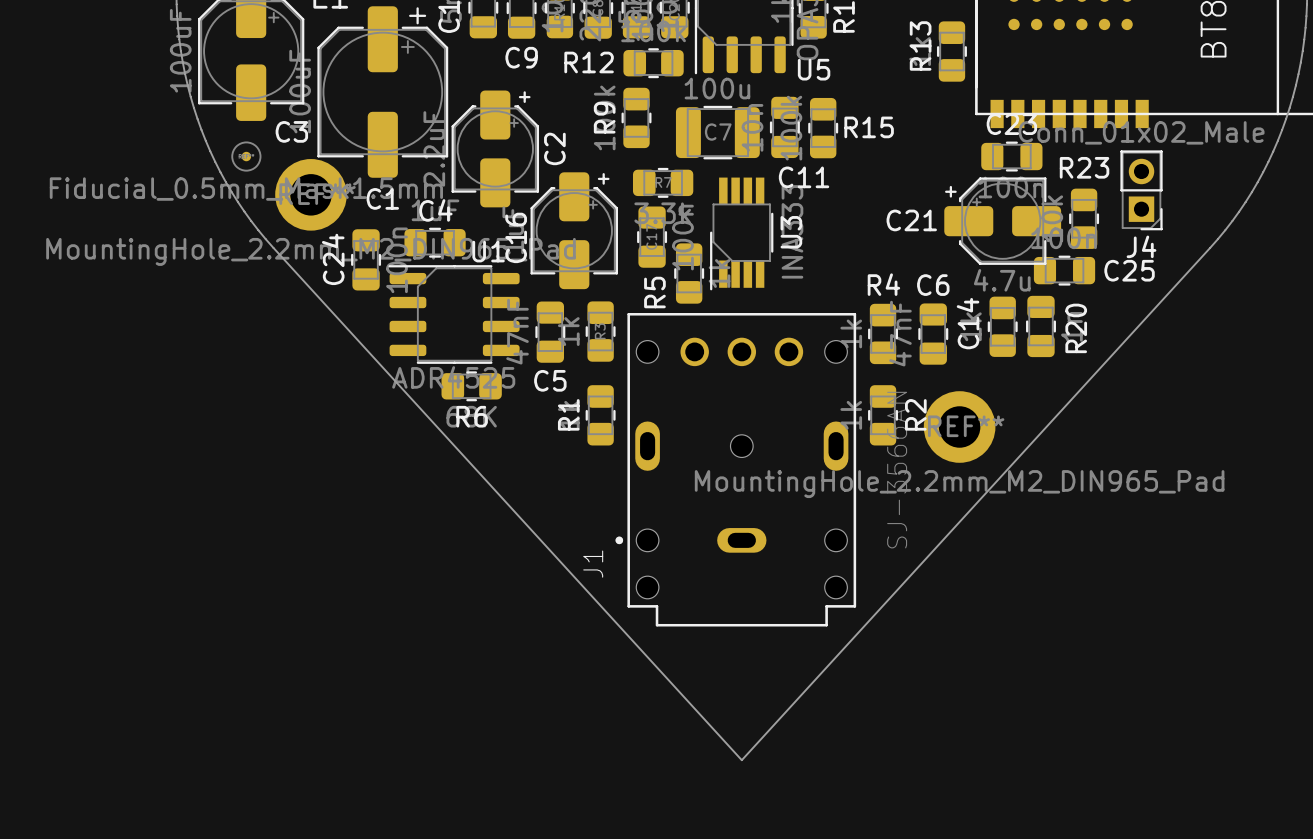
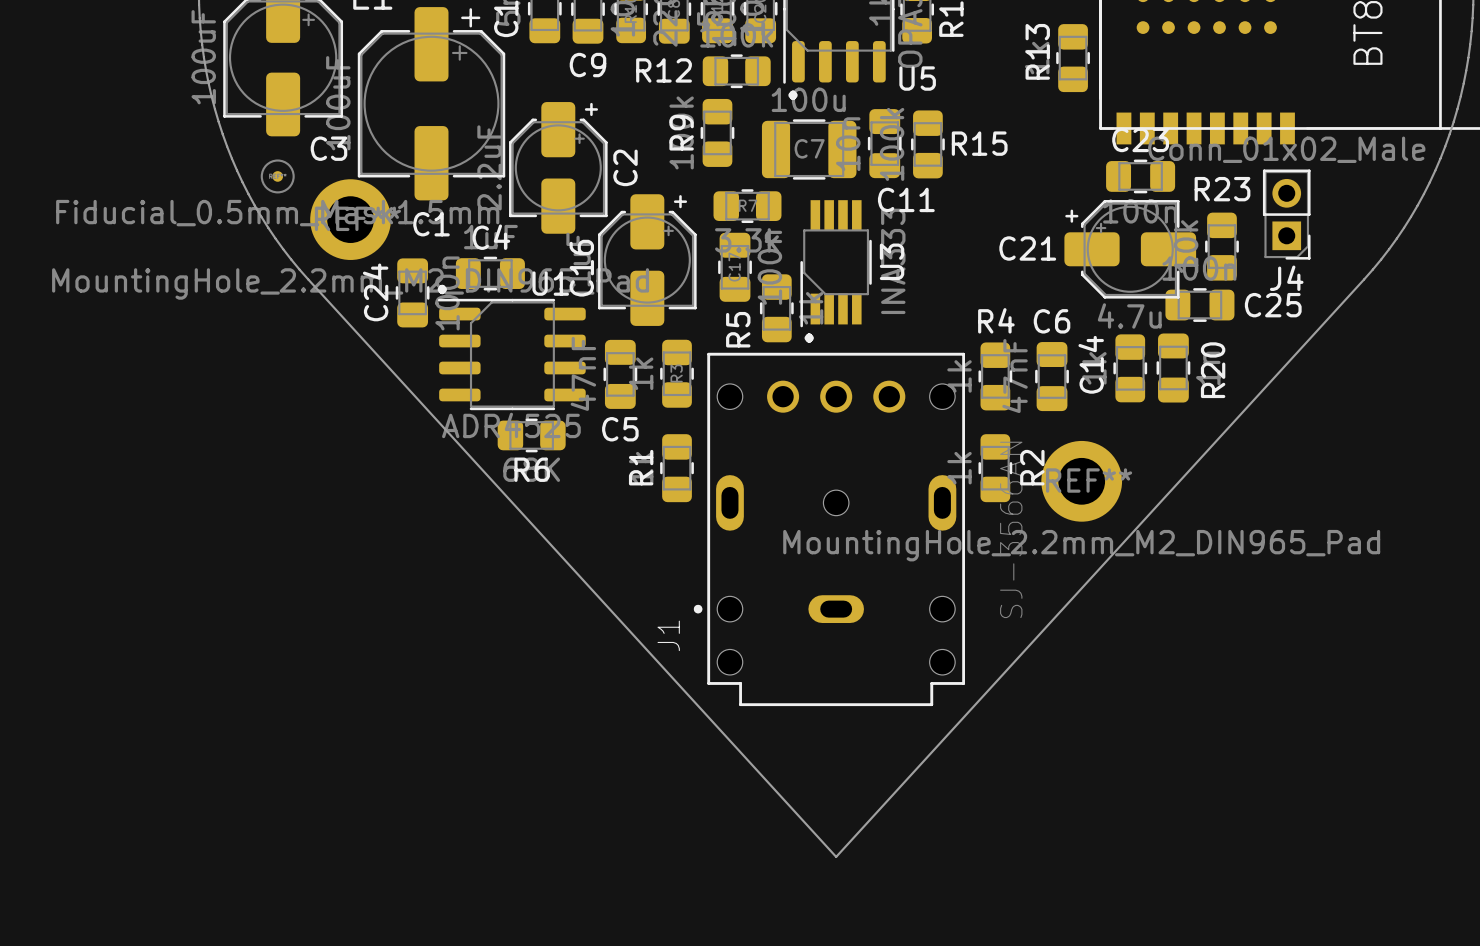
text: none -> . (793, 95)
text: none -> . (442, 289)
text: none -> . (809, 338)

